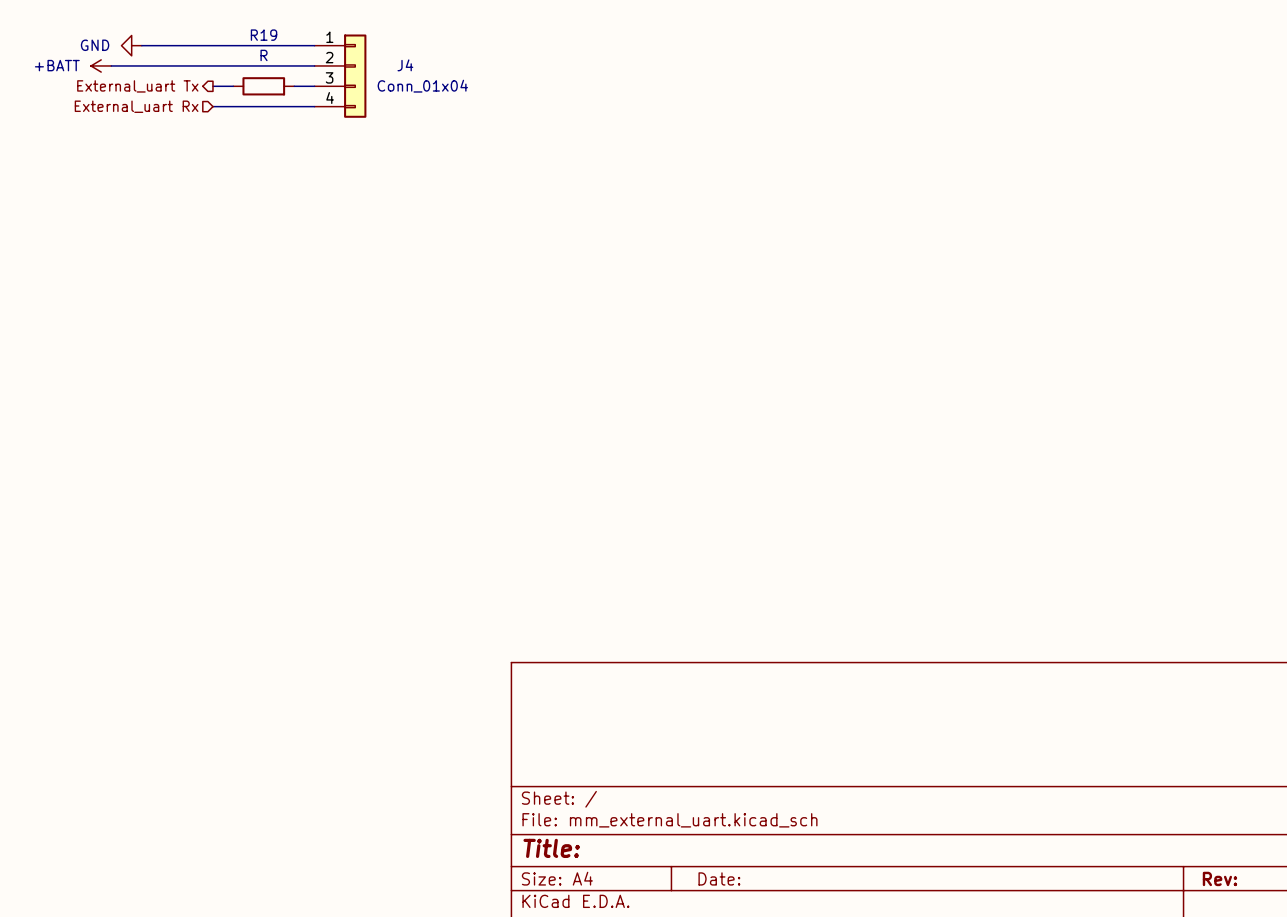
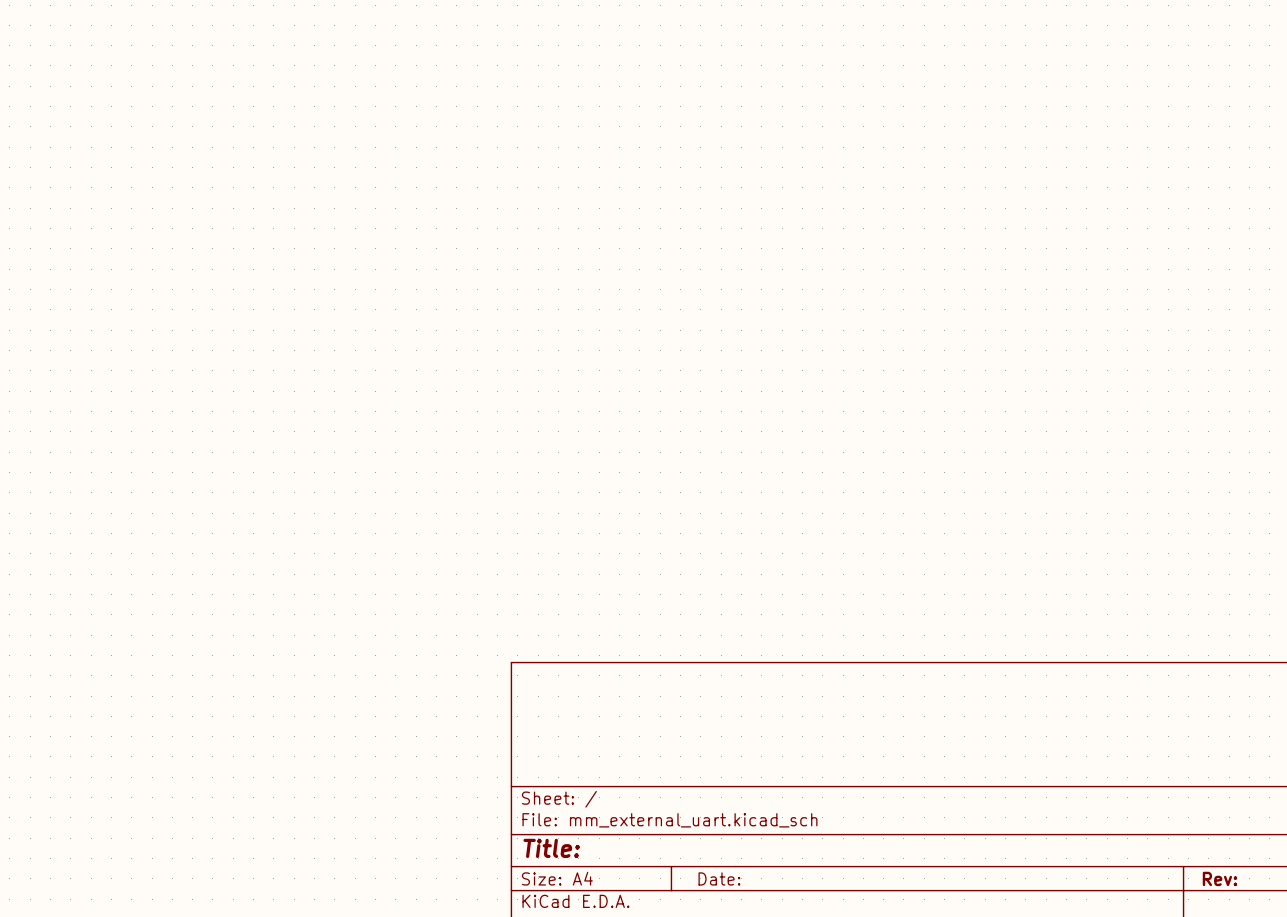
power symbol: GND (131, 45) -> none
wire: (141, 45) (314, 45) -> none
power symbol: +BATT (101, 65) -> none
wire: (111, 65) (314, 65) -> none
J4: Conn_01x04 (340, 76) -> none
hierarchical label: External_uart Tx (137, 86) -> none
wire: (212, 86) (233, 86) -> none
R19: R (263, 86) -> none
wire: (294, 86) (314, 86) -> none
hierarchical label: External_uart Rx (136, 106) -> none
wire: (212, 106) (314, 106) -> none

